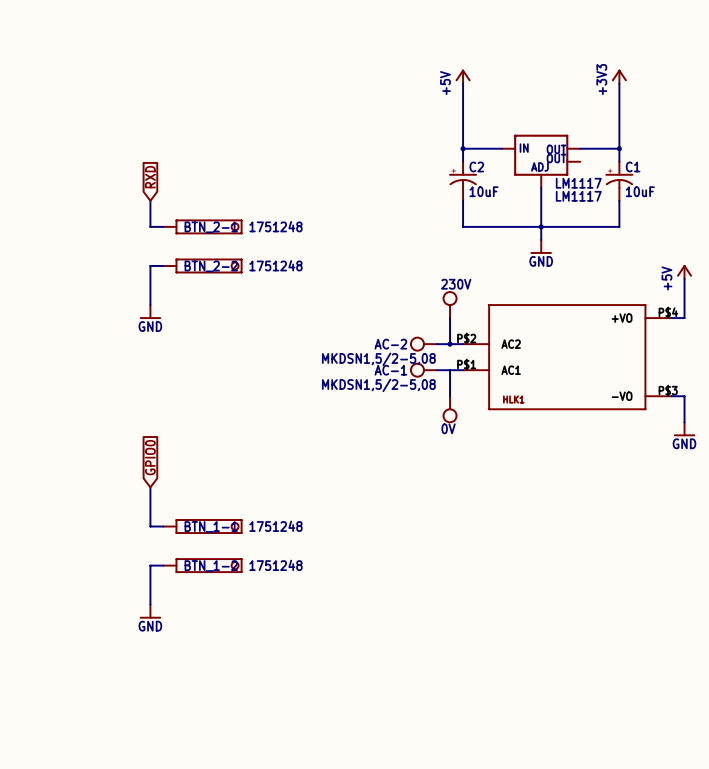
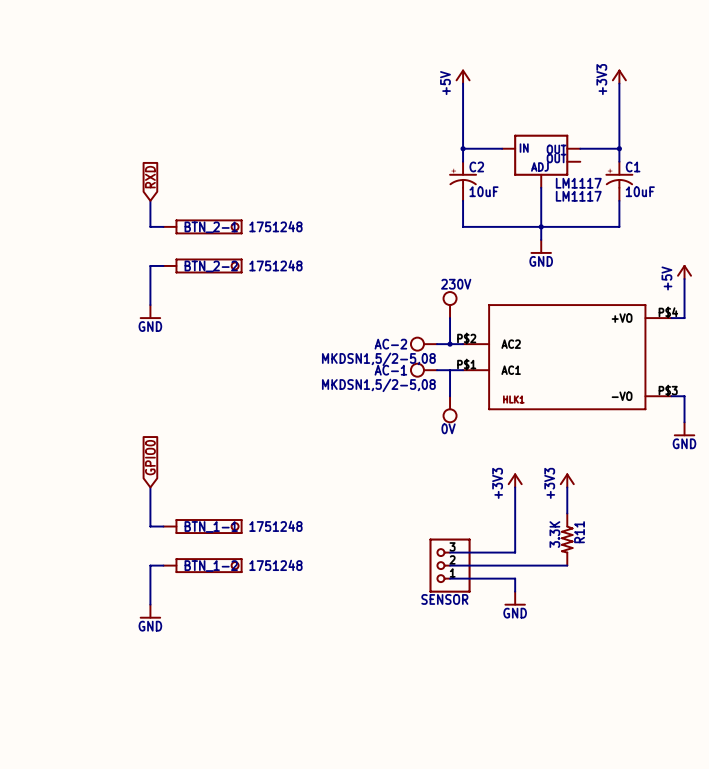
power symbol: none -> +3V3 (515, 480)
power symbol: none -> +3V3 (567, 480)
wire: none -> (515, 487) (515, 552) (450, 552)
wire: none -> (567, 487) (567, 513)
R11: none -> 3.3K (567, 539)
wire: none -> (450, 565) (567, 565)
SENSOR: none -> (450, 565)
wire: none -> (450, 578) (515, 578) (515, 591)
power symbol: none -> GND (515, 598)

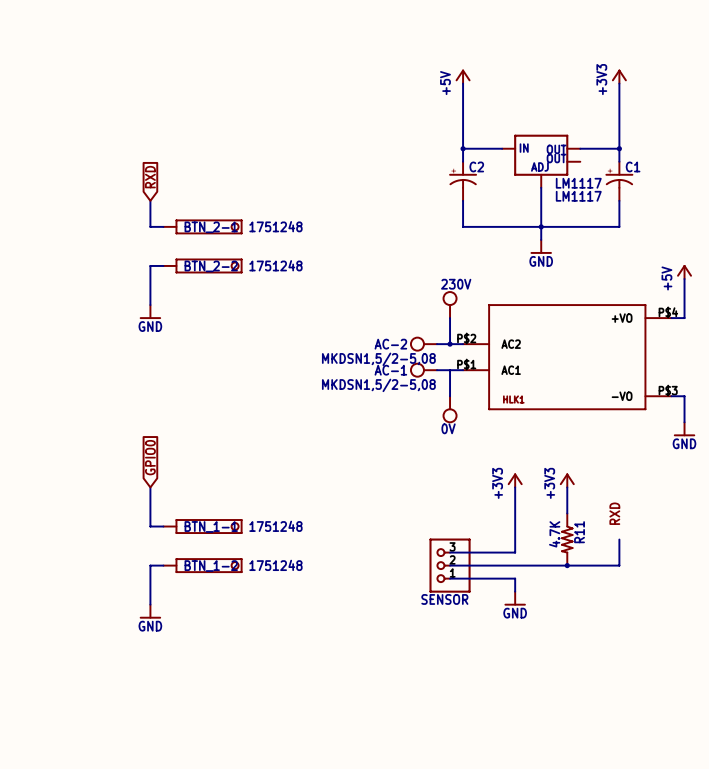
C2 value: 10uF (483, 191) -> none
C1 value: 10uF (640, 191) -> none
label: none -> RXD (614, 513)
R11 value: 3.3K (554, 534) -> 4.7K (554, 534)
wire: none -> (619, 539) (619, 565) (567, 565)
junction: none -> (567, 565)

